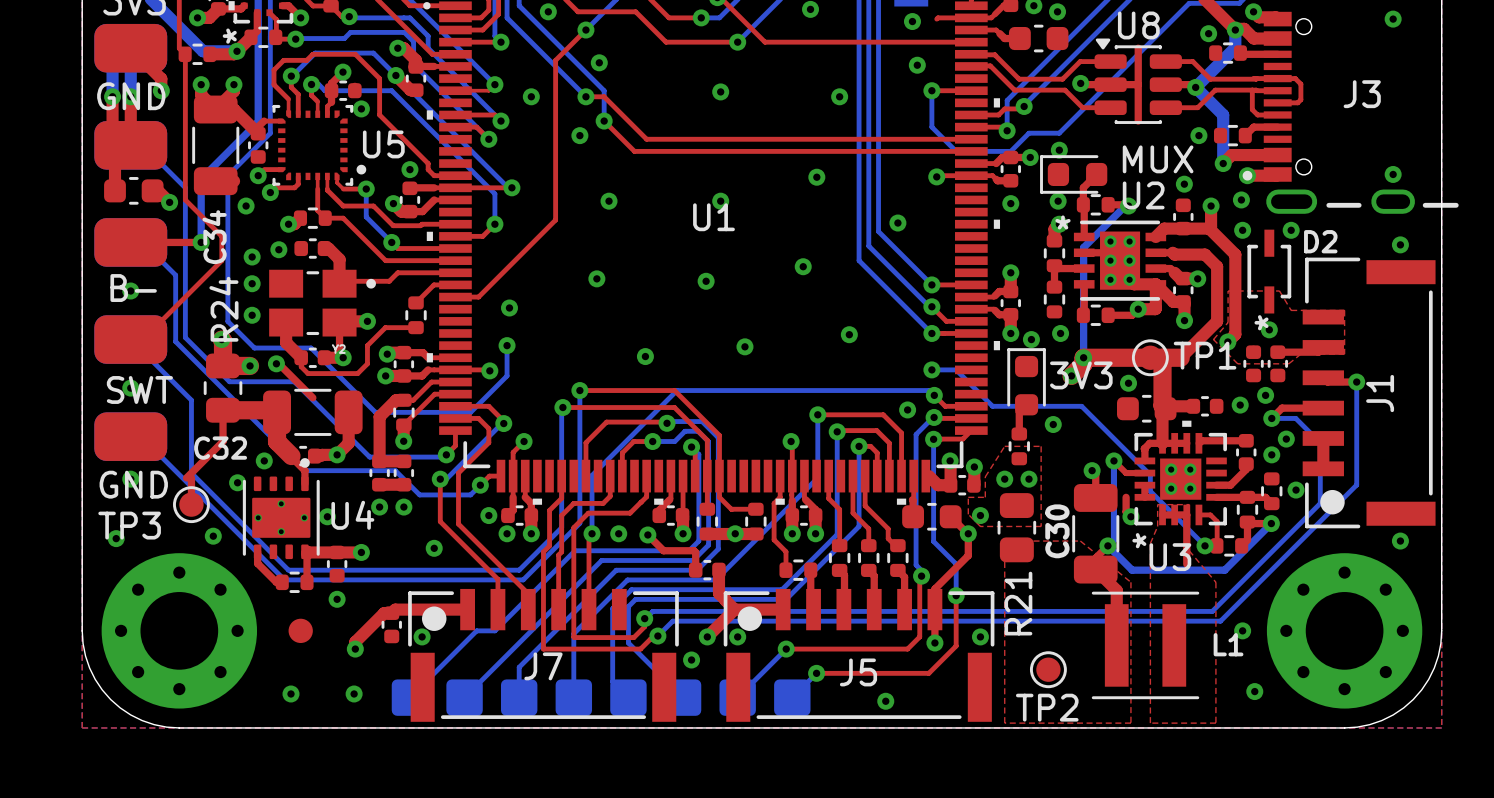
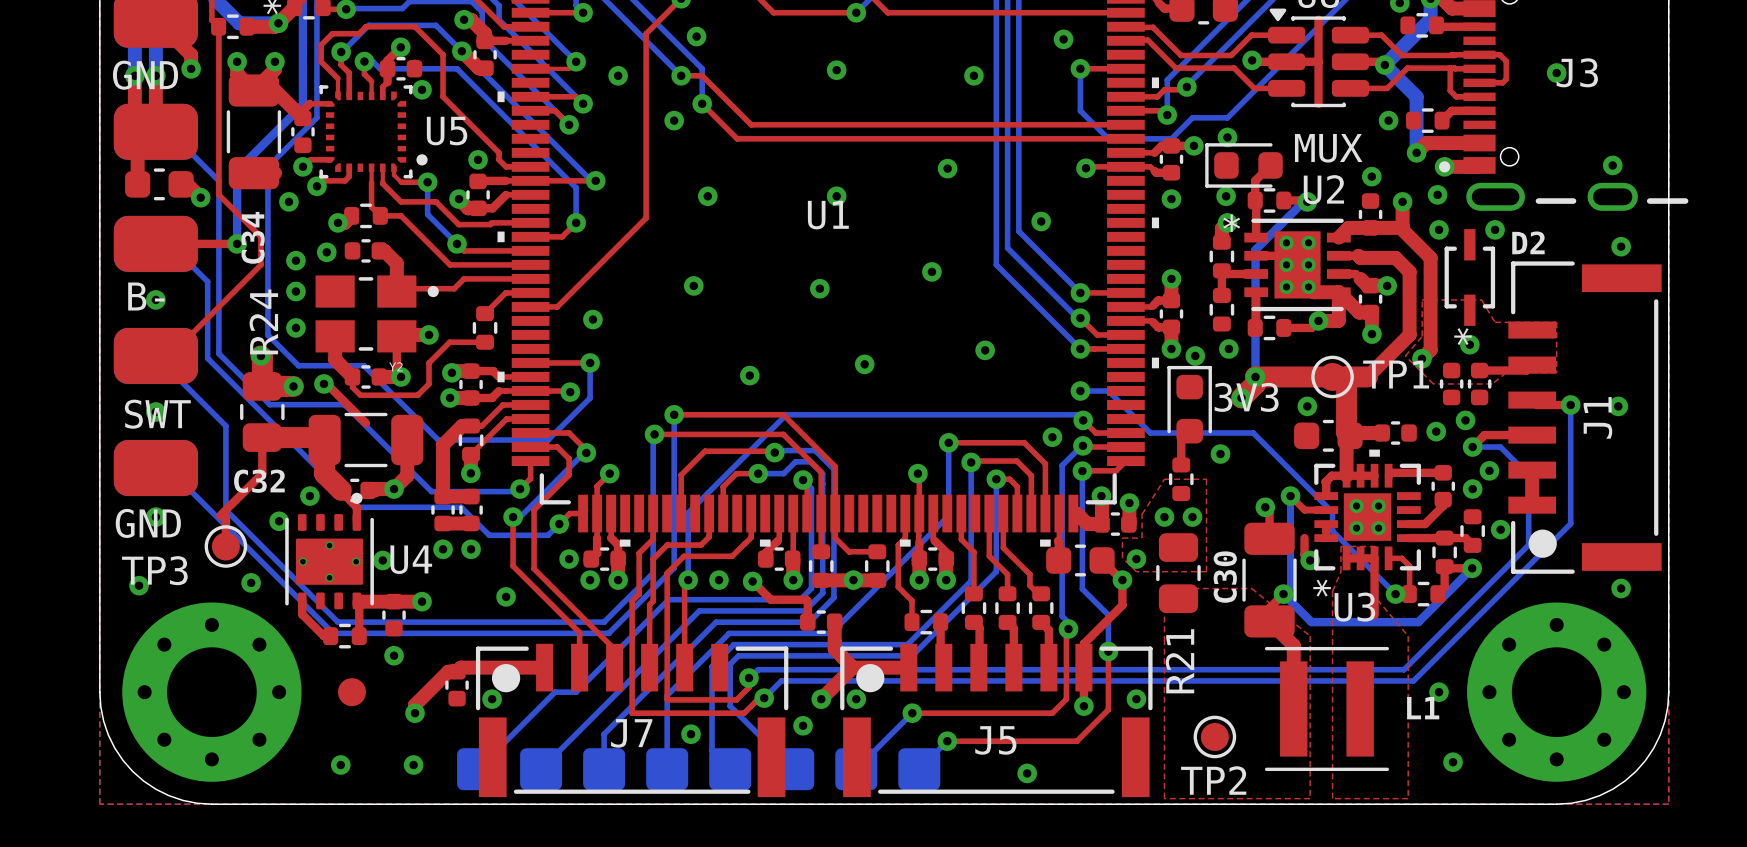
via: none -> (1556, 73)
top track: none -> (530, 362) (590, 362)
via: none -> (1618, 406)
via: none -> (690, 734)

